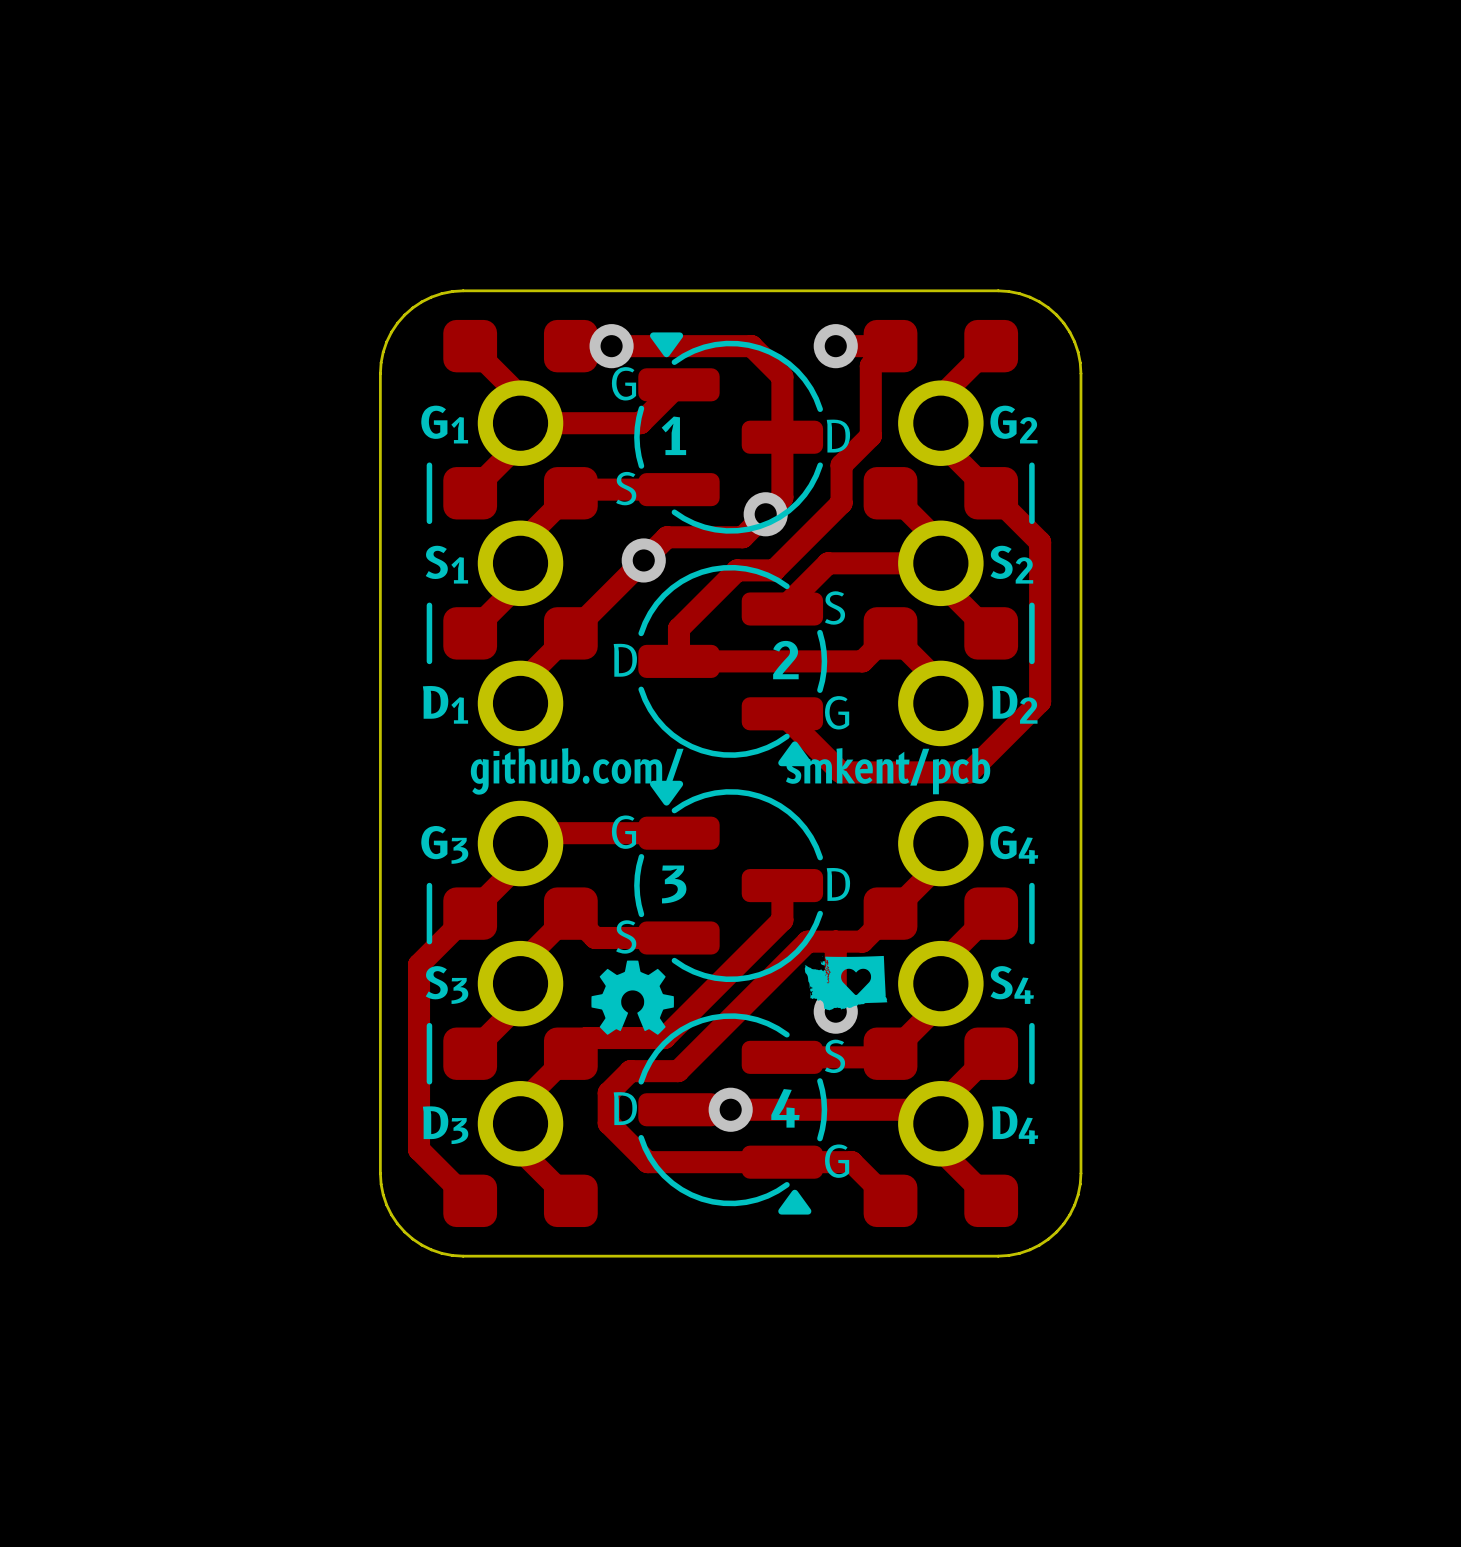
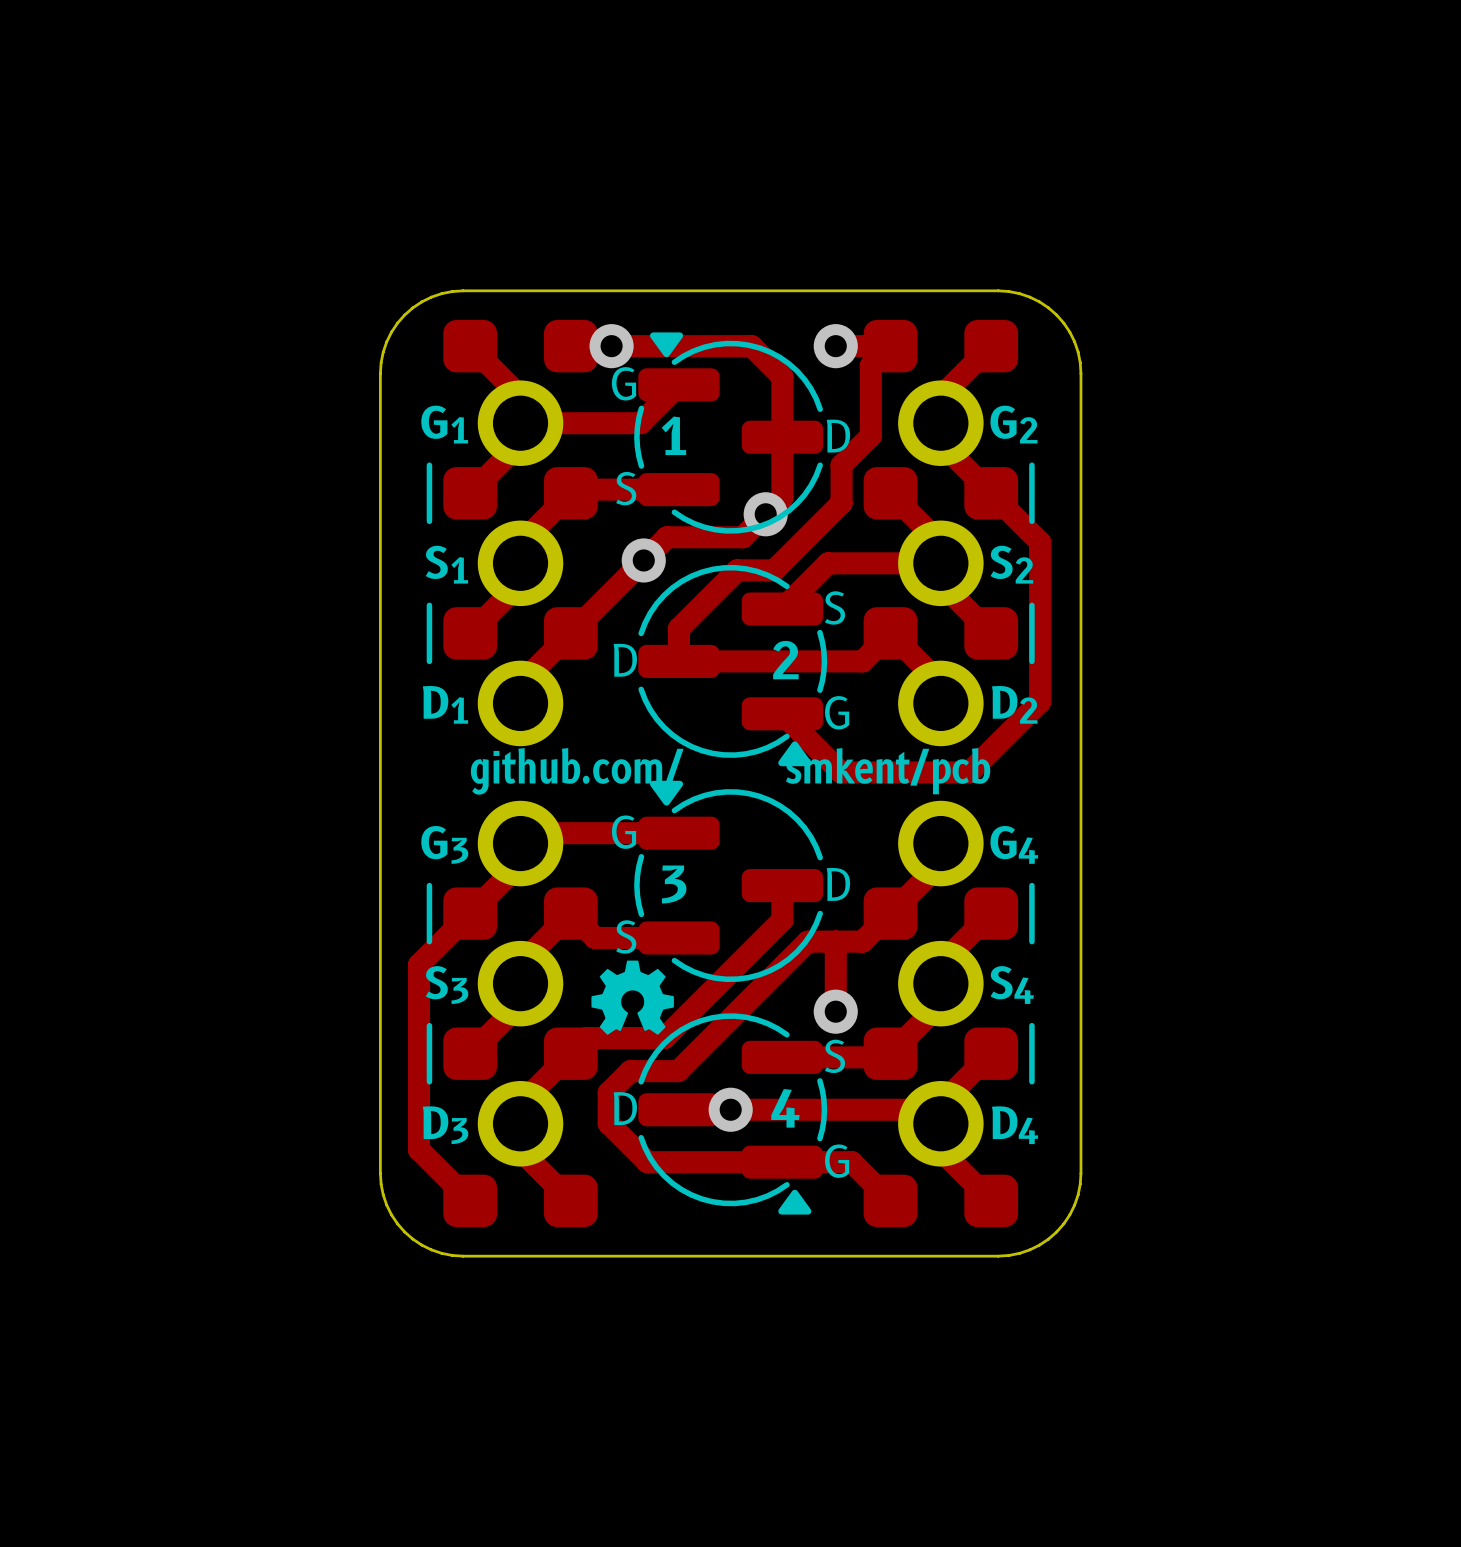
drawing: [804, 955, 888, 1011] -> none

